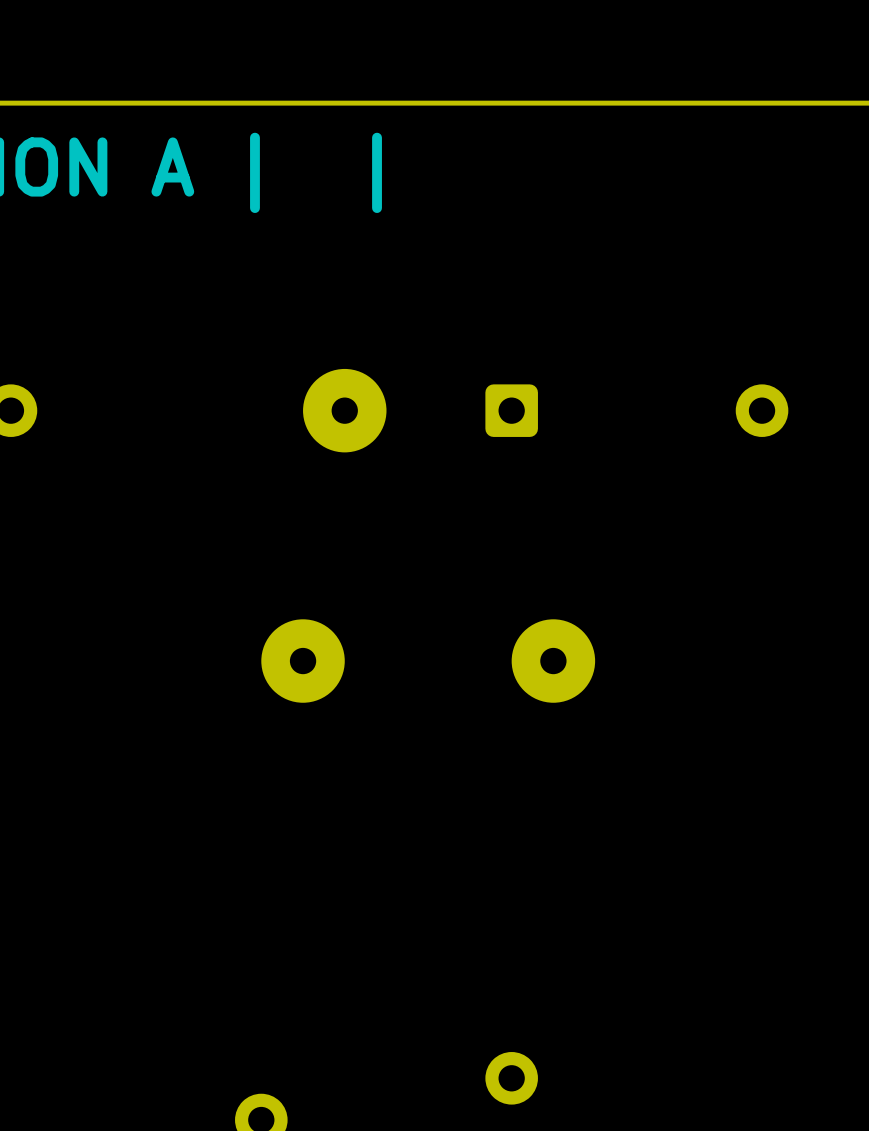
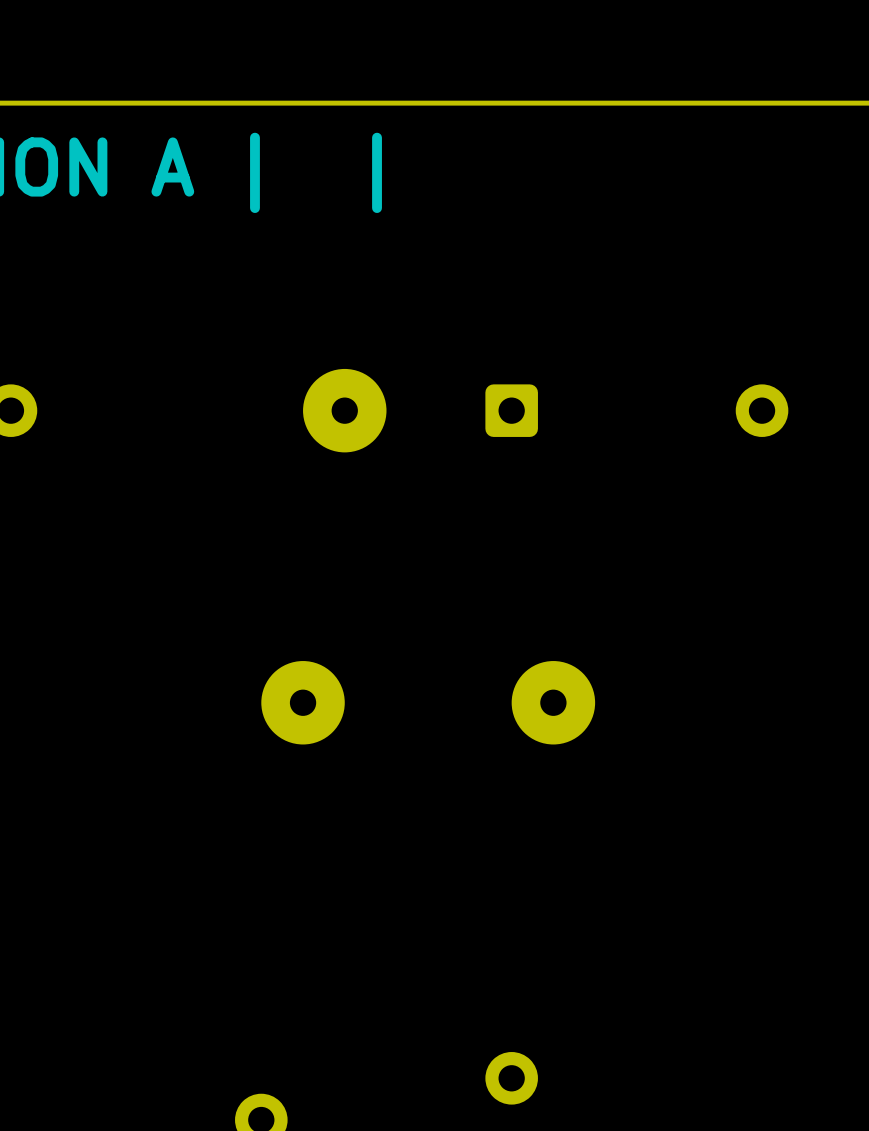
part position: (303, 661) -> (303, 702)
part position: (553, 661) -> (553, 702)

